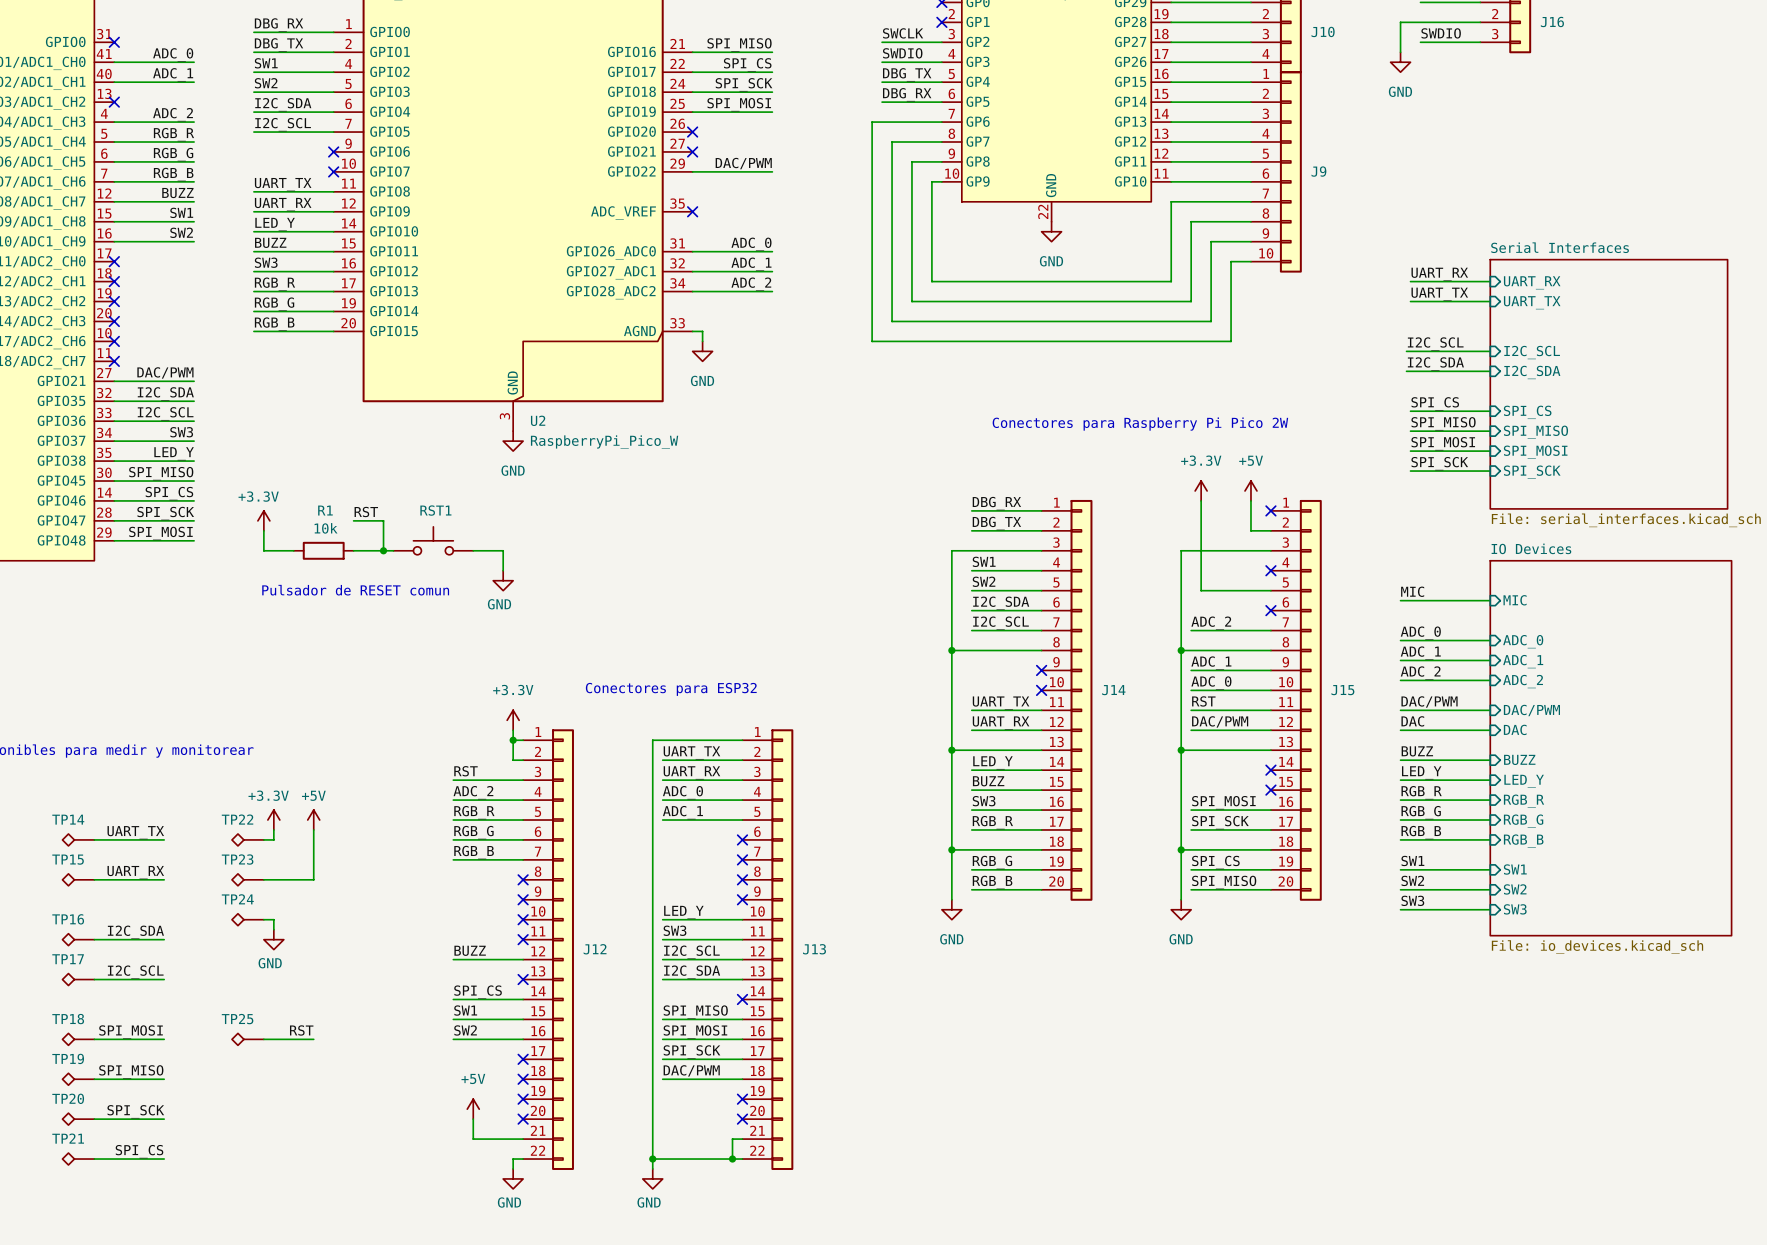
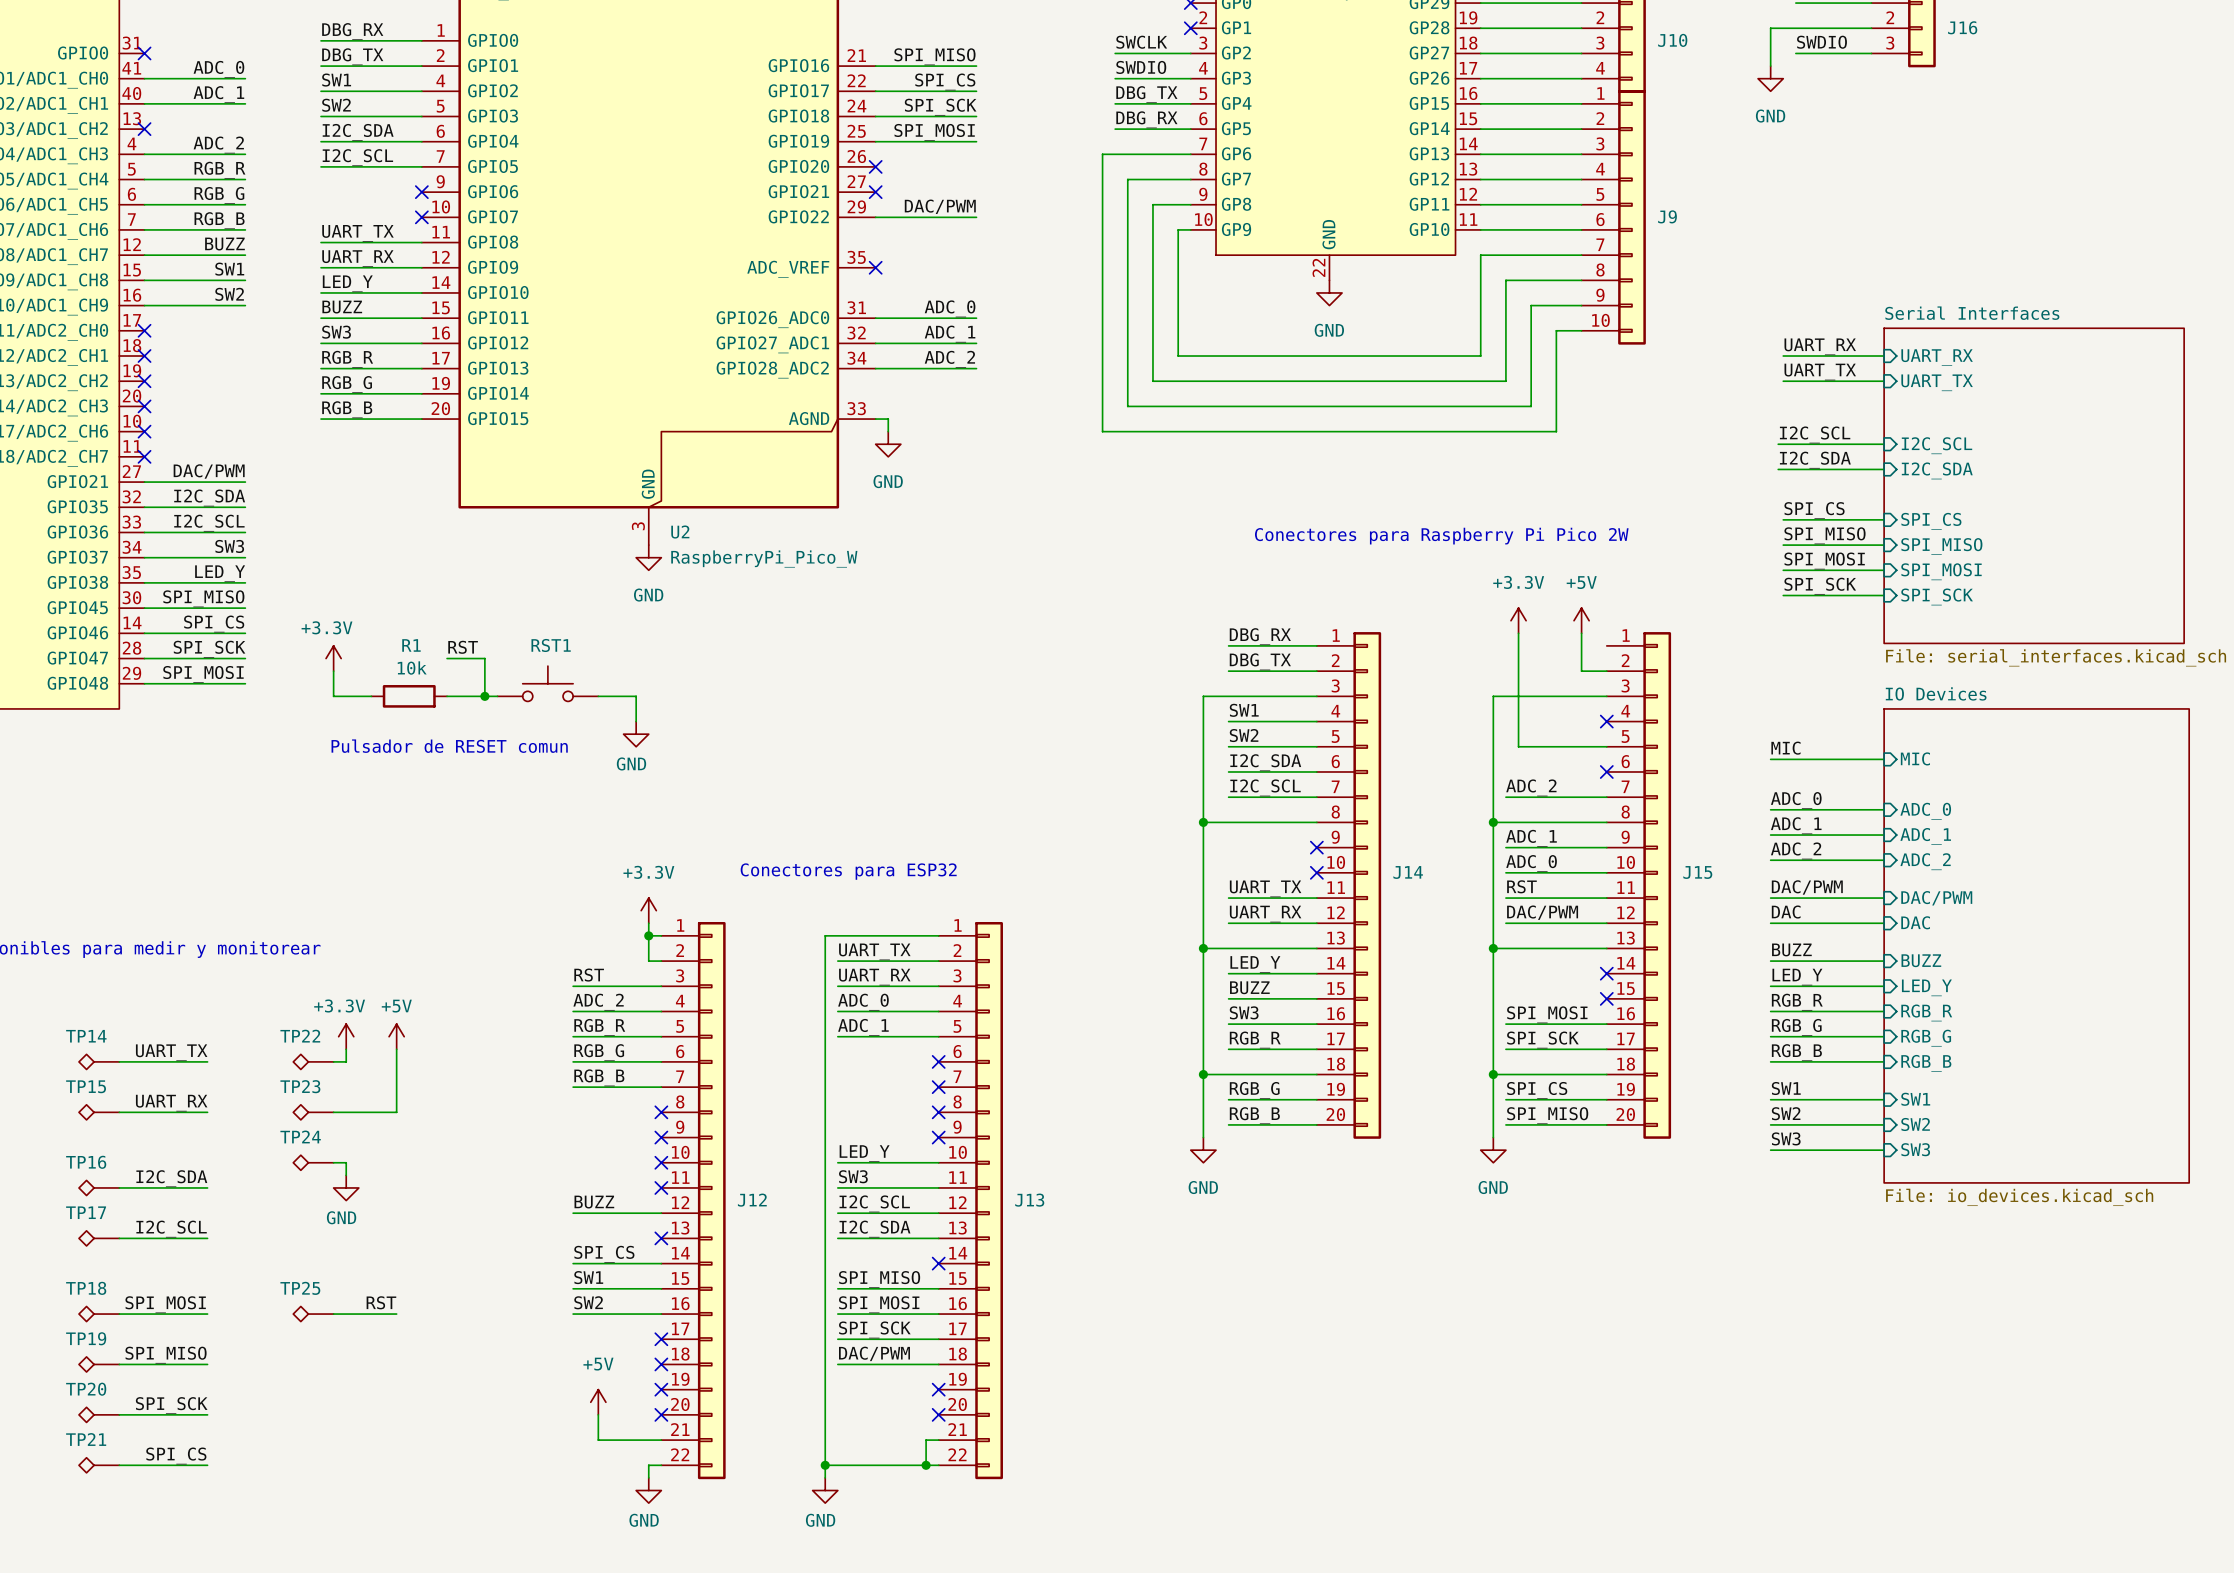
no-connect mark: (1270, 510) -> none

